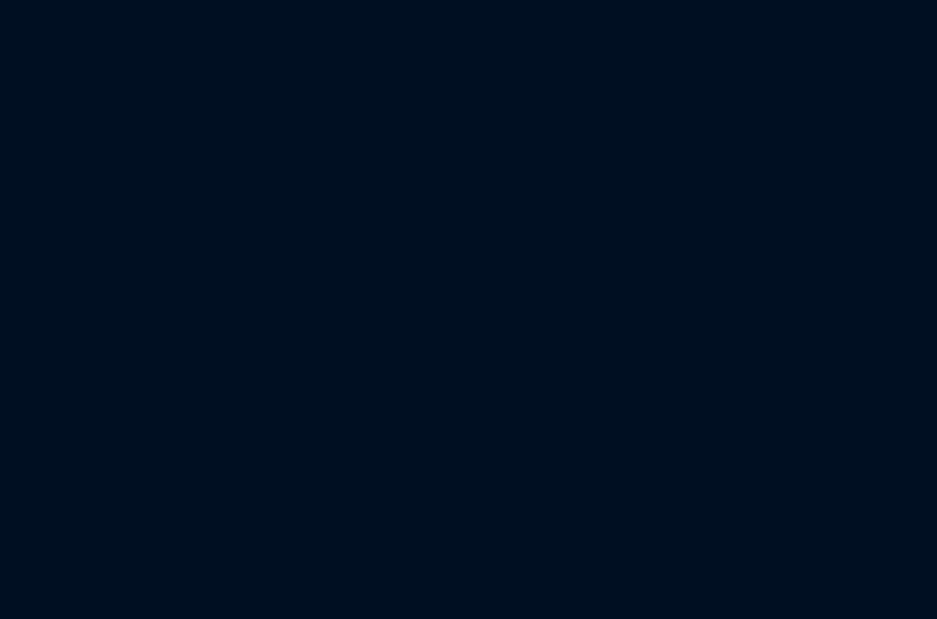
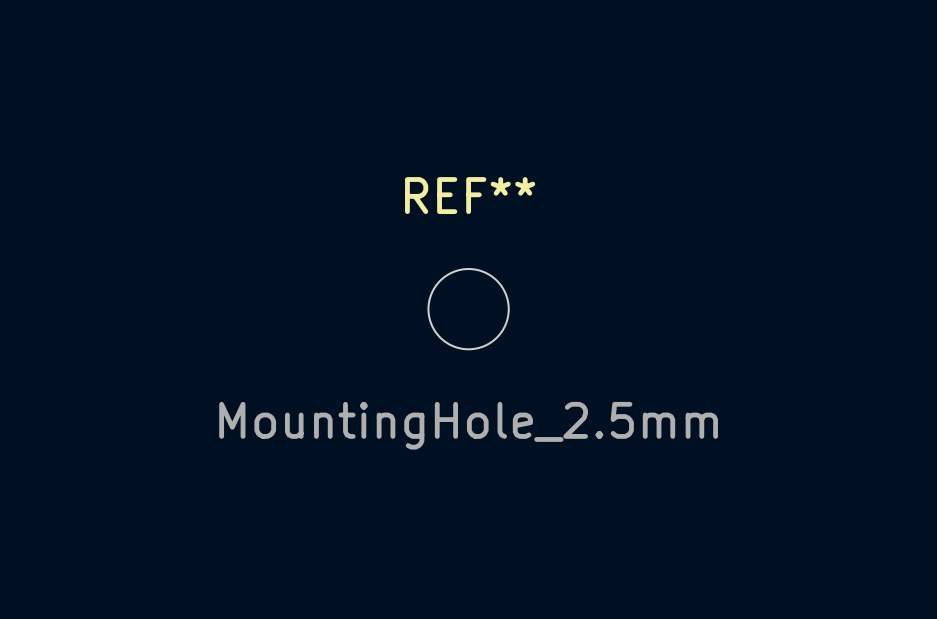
REF**: none -> MountingHole_2.5mm (468, 309)

